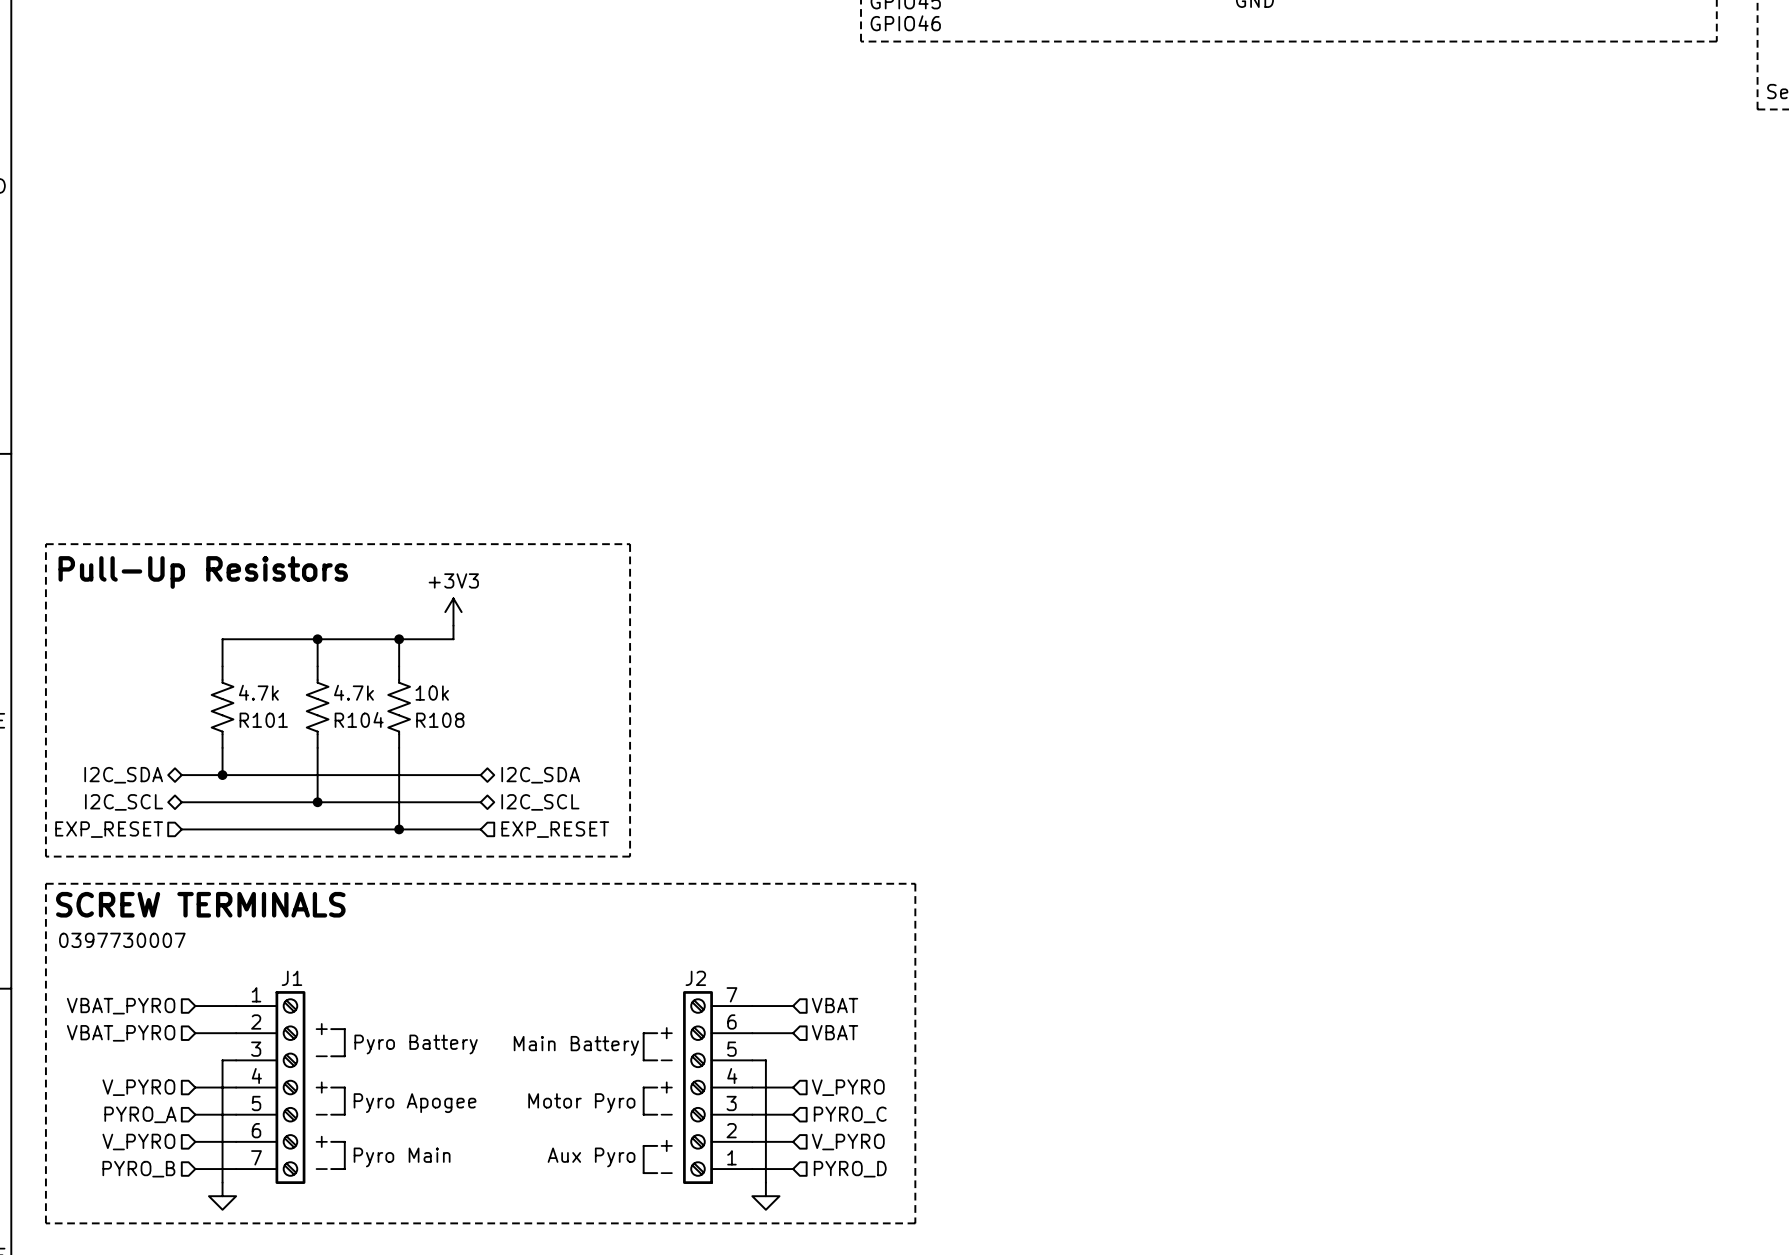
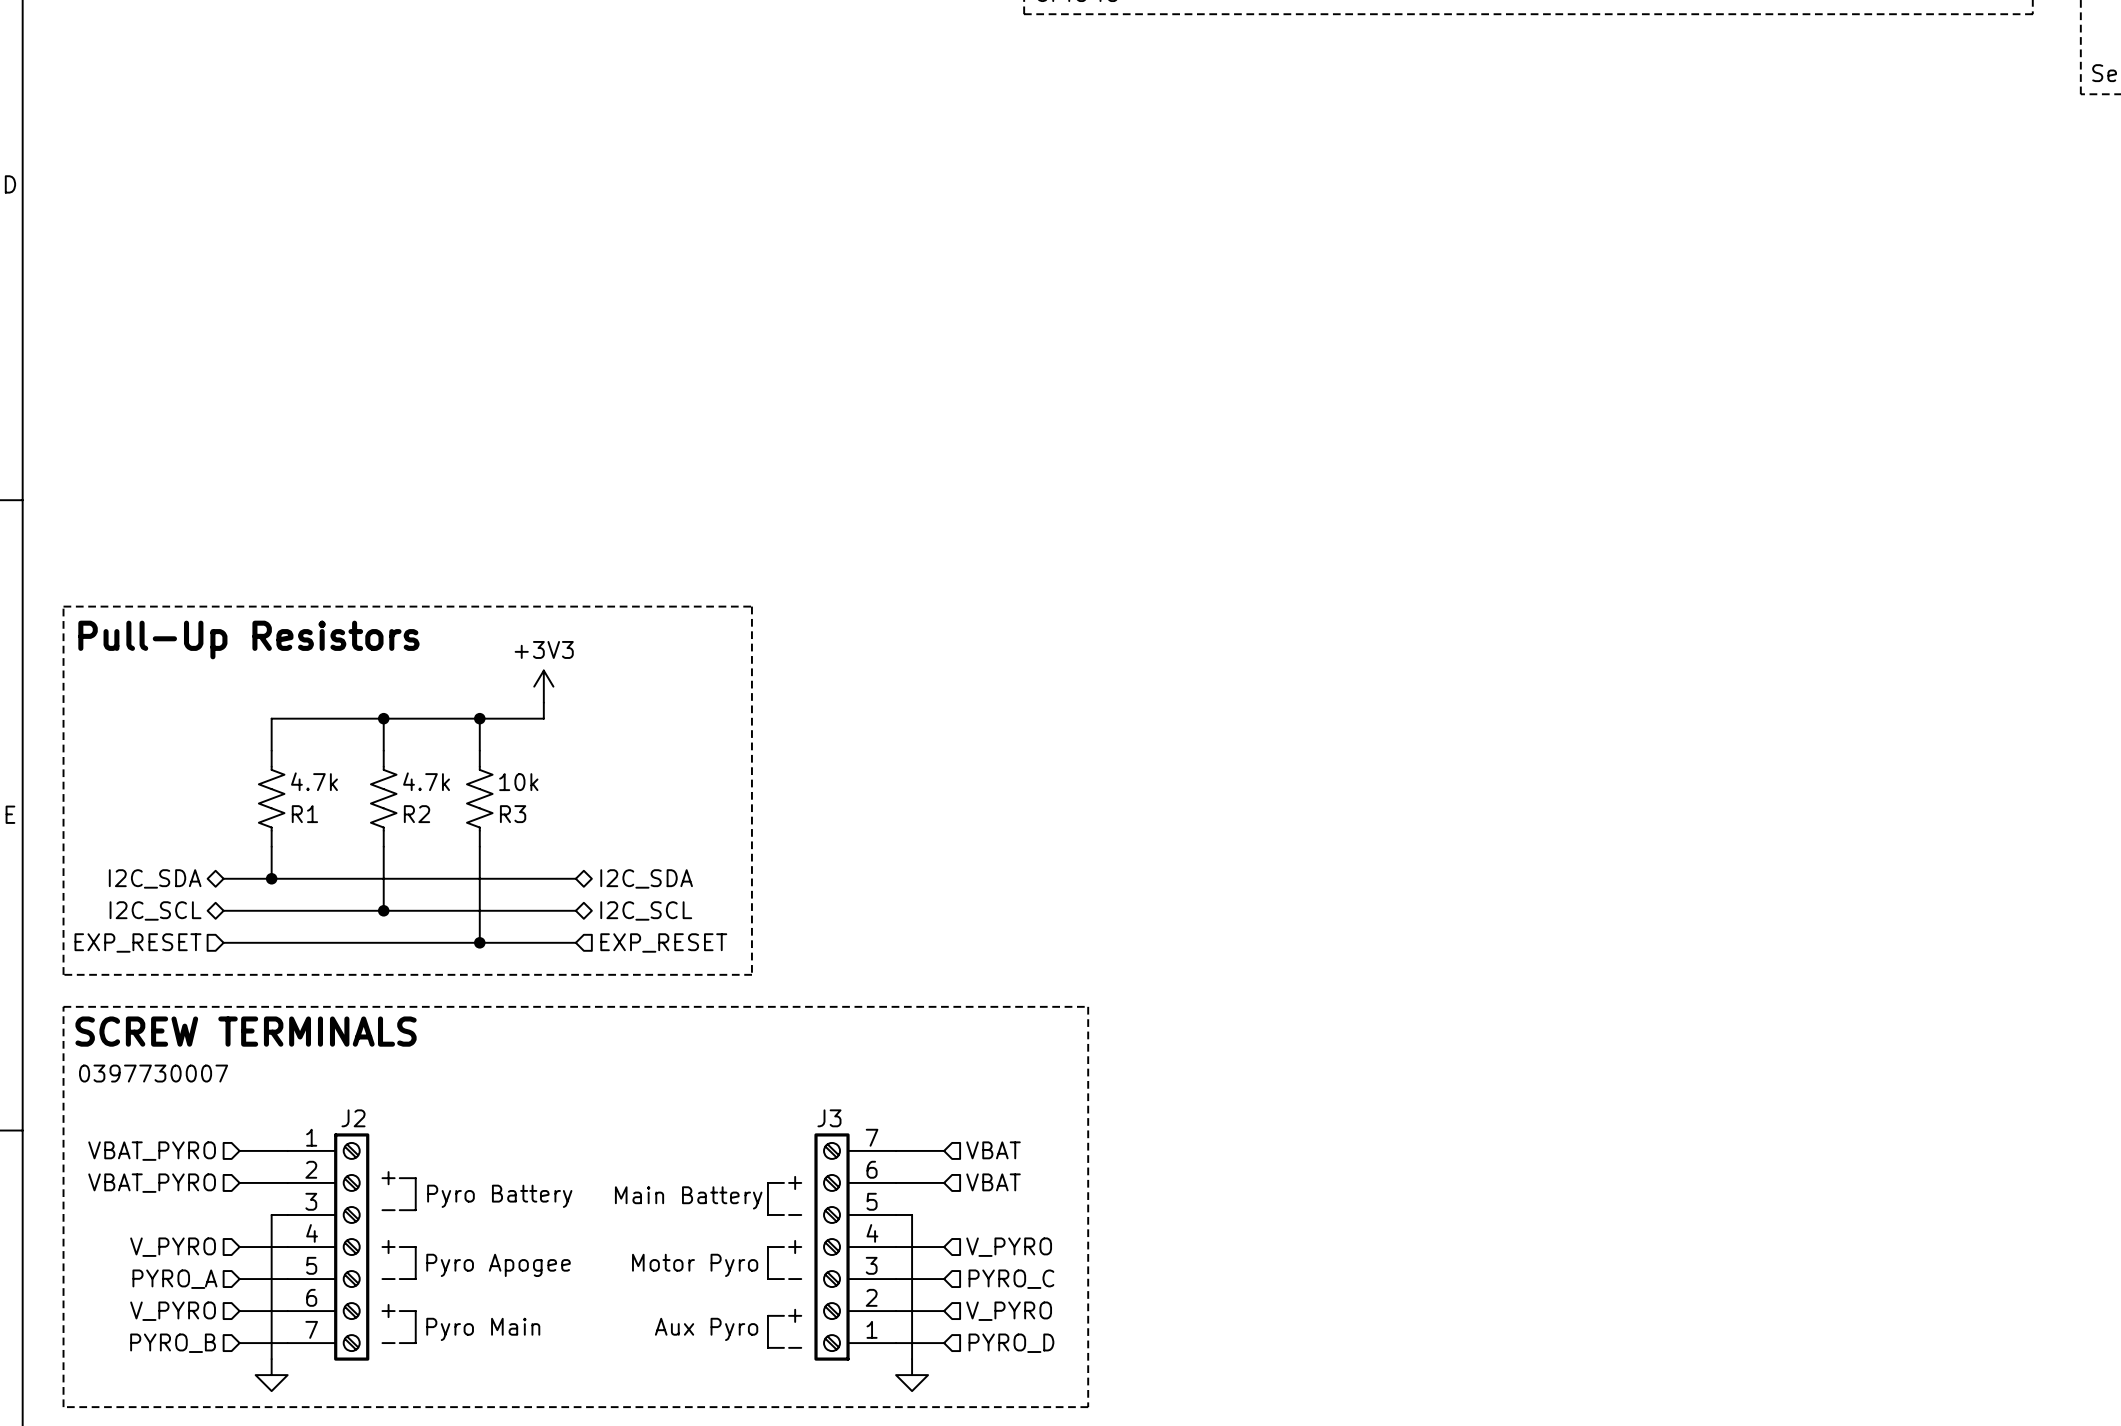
R104 name: R104 (359, 719) -> R2 (417, 814)
R101 name: R101 (263, 720) -> R1 (304, 814)
R108 name: R108 (440, 720) -> R3 (513, 814)
J1 name: J1 (291, 978) -> J2 (353, 1118)
J2 name: J2 (695, 978) -> J3 (829, 1118)

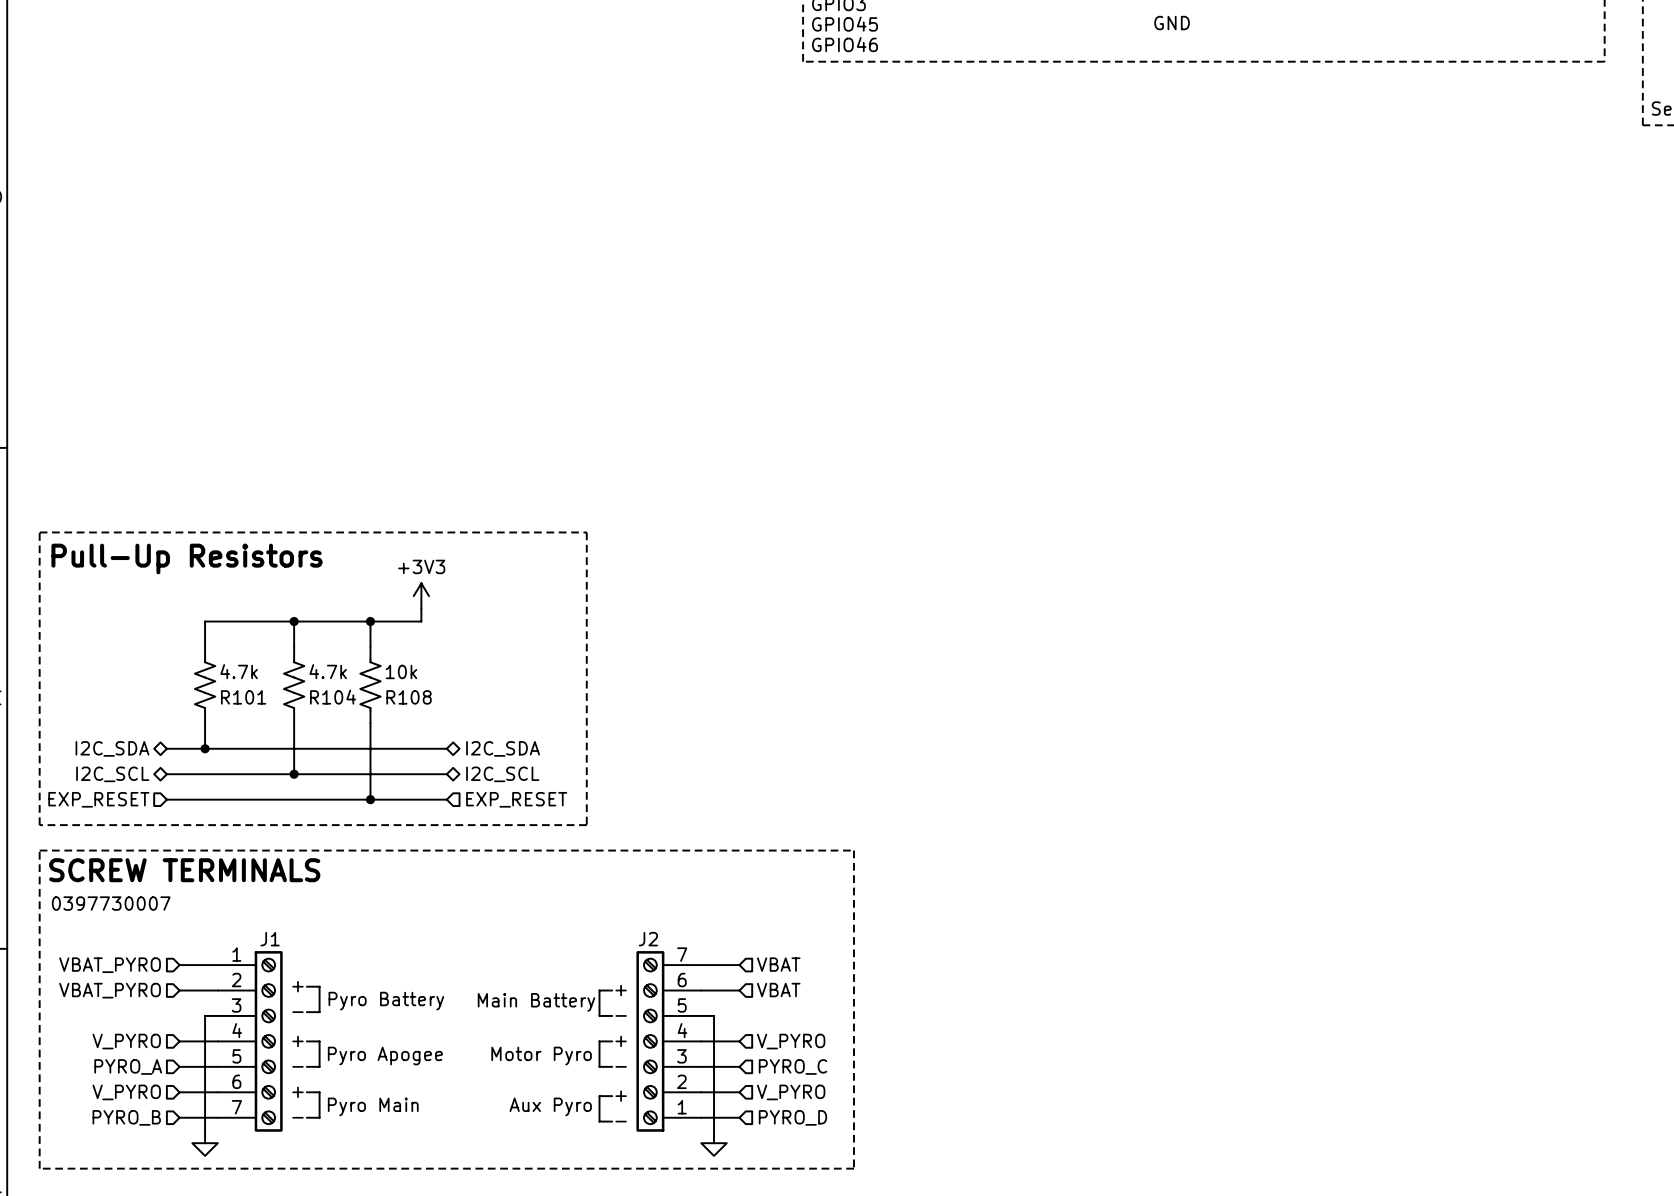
R1 name: R1 (304, 814) -> R101 (243, 697)
R2 name: R2 (417, 814) -> R104 (333, 697)
R3 name: R3 (513, 814) -> R108 (409, 697)
J2 name: J2 (353, 1118) -> J1 (270, 939)
J3 name: J3 (829, 1118) -> J2 (648, 939)

